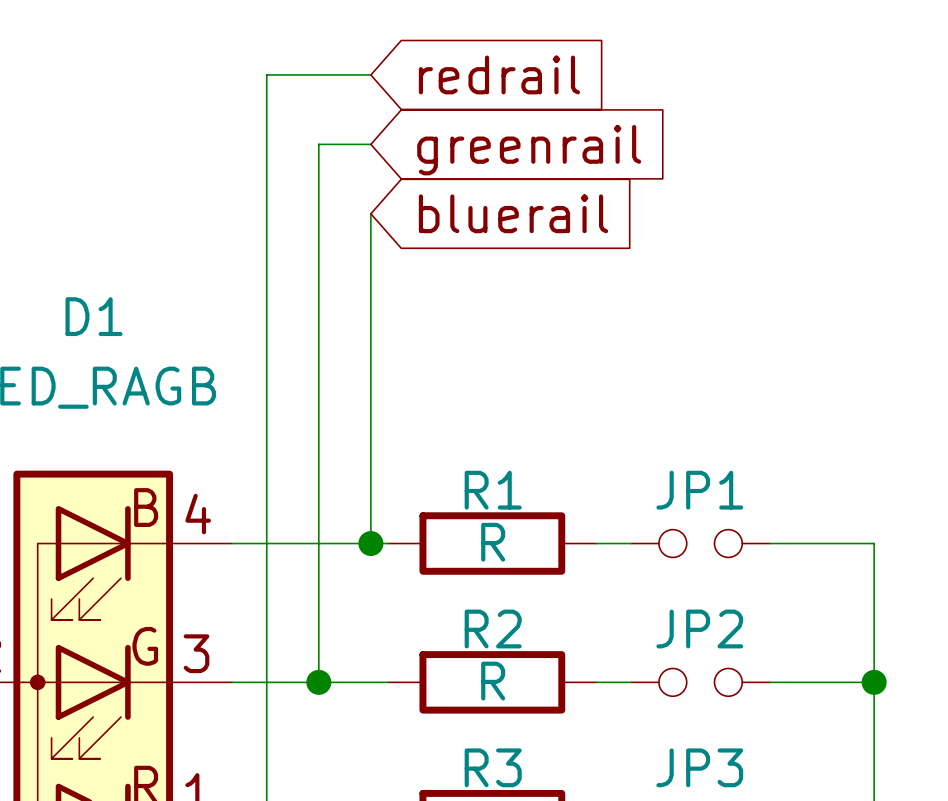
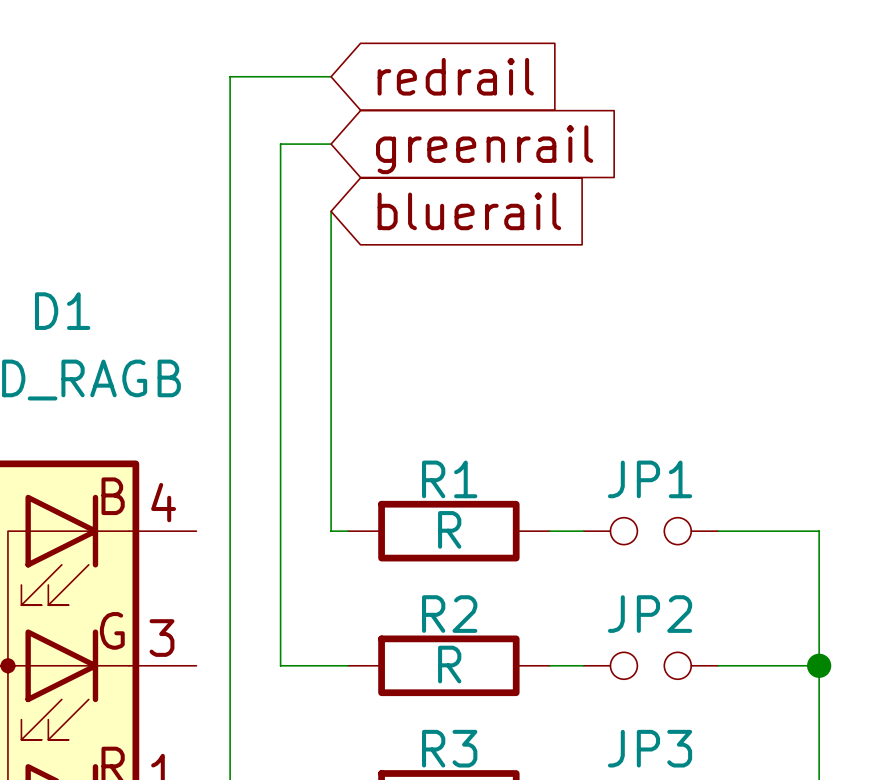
wire: (232, 543) (370, 543) -> none
junction: (370, 543) -> none
wire: (232, 682) (318, 682) -> none
junction: (318, 682) -> none

